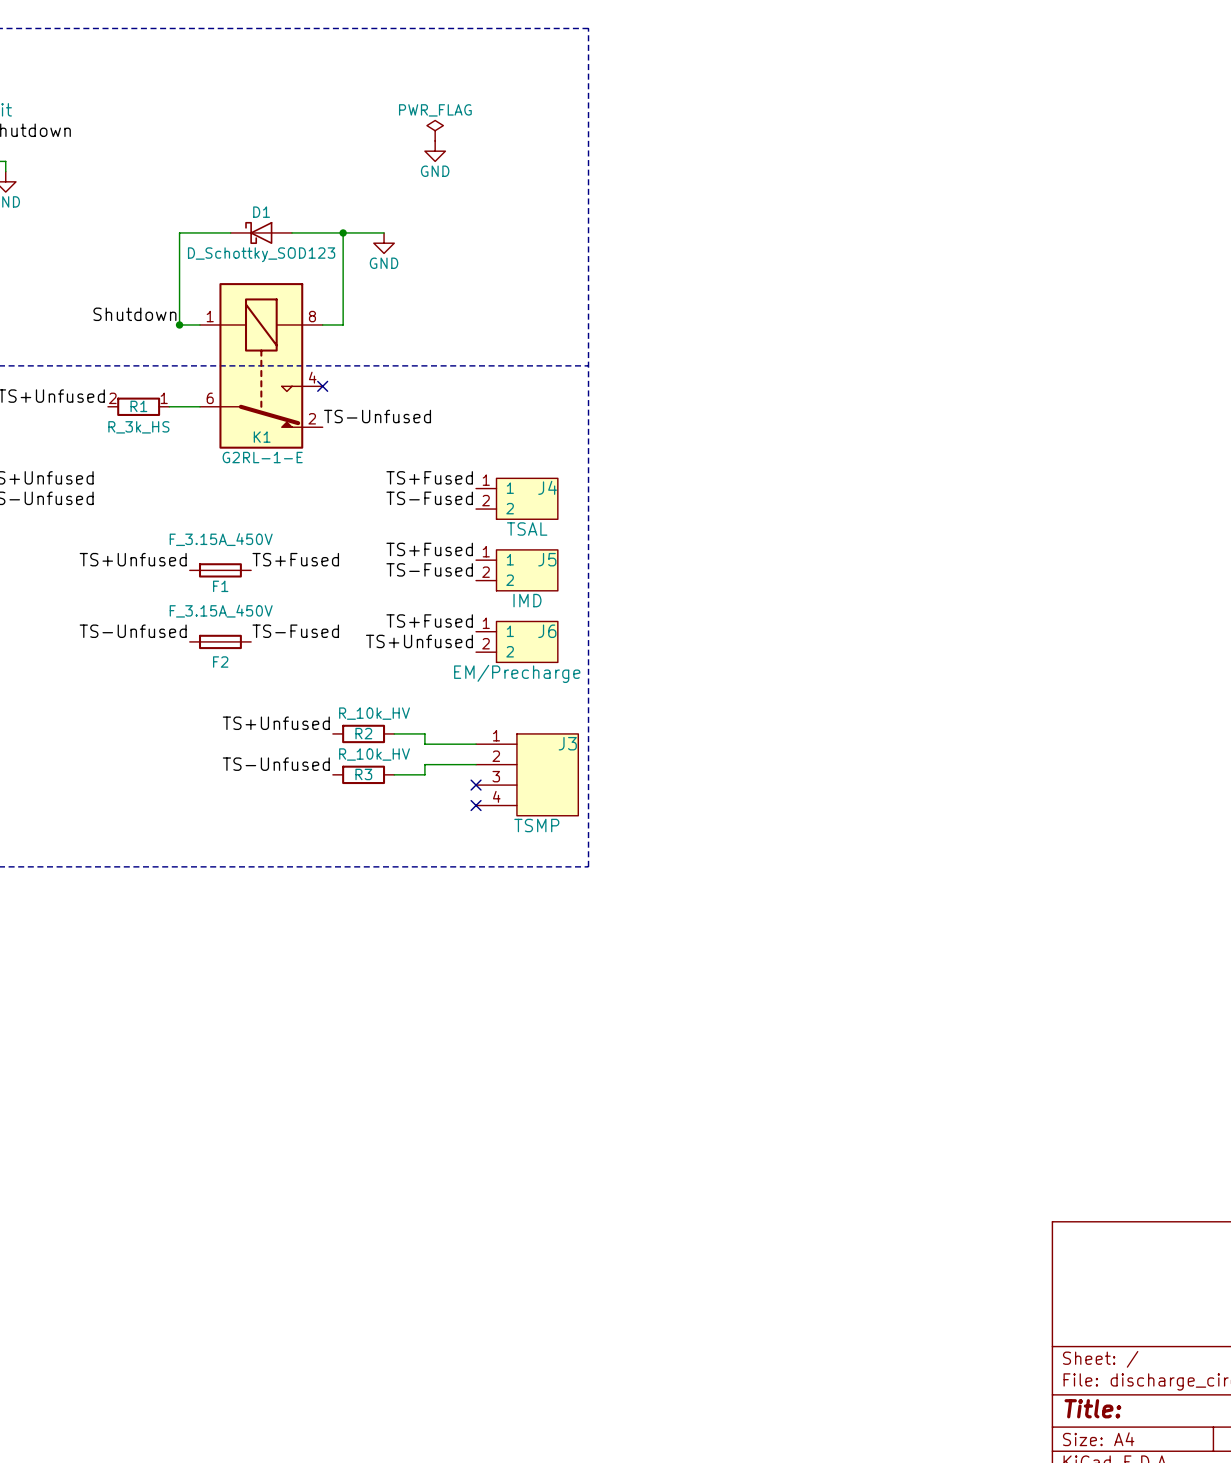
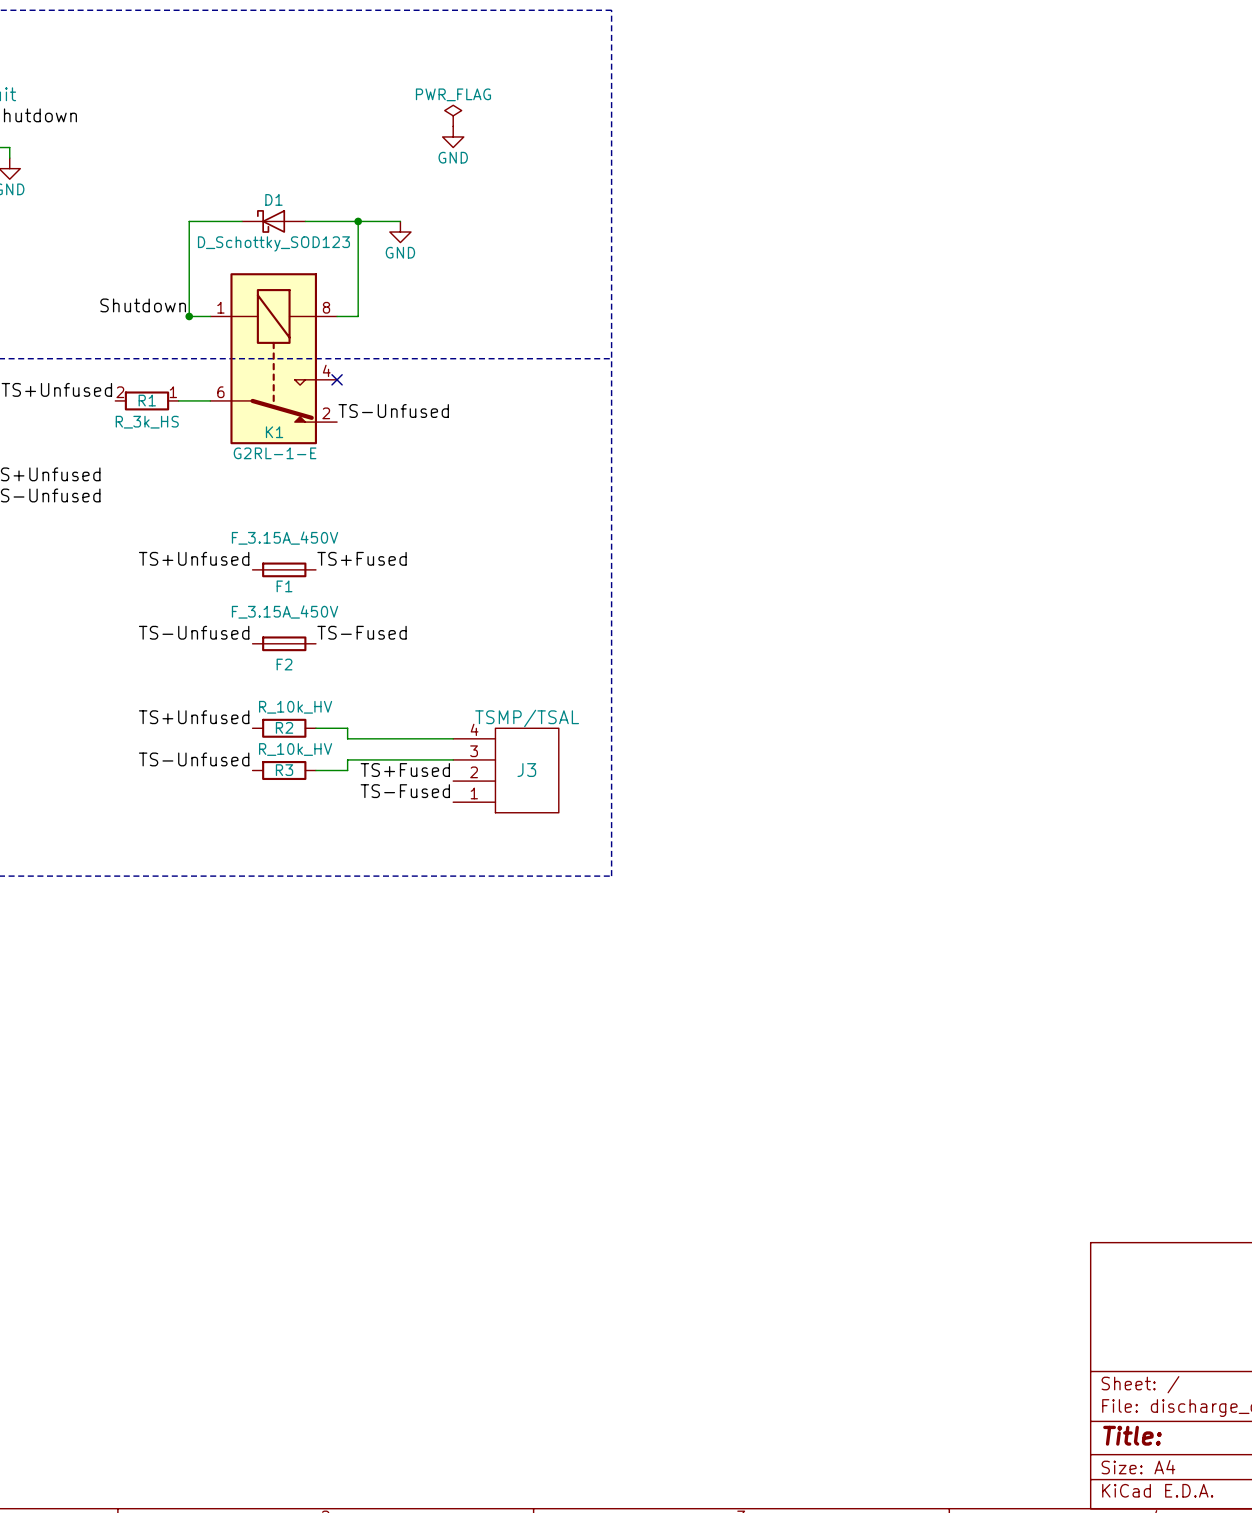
label: TS+Fused (429, 477) -> none
label: TS-Fused (429, 498) -> none
J4: TSAL (516, 498) -> none
label: TS+Fused (429, 549) -> none
label position: TS+Unfused (133, 559) -> TS+Unfused (194, 558)
label position: TS+Fused (295, 559) -> TS+Fused (362, 558)
label: TS-Fused (429, 569) -> none
F1 position: (220, 570) -> (284, 569)
J5: IMD (516, 570) -> none
label: TS+Fused (429, 621) -> none
label position: TS-Unfused (133, 631) -> TS-Unfused (194, 632)
label position: TS-Fused (295, 631) -> TS-Fused (362, 632)
F2 position: (220, 641) -> (284, 643)
label: TS+Unfused (419, 641) -> none
J6: EM/Precharge (516, 641) -> none
label position: TS+Unfused (276, 723) -> TS+Unfused (194, 717)
wire: none -> (315, 728) (347, 728) (347, 738) (410, 738)
R2 position: (363, 733) -> (284, 728)
wire: (424, 733) (424, 744) (476, 744) -> (442, 738) (453, 738)
J3 symbol: [476, 733, 579, 816] -> [453, 728, 559, 813]
J3 name position: J3 (567, 743) -> J3 (526, 770)
wire: none -> (453, 759) (347, 759) (347, 770) (315, 770)
label position: TS-Unfused (276, 764) -> TS-Unfused (194, 759)
label: none -> TS+Fused (405, 770)
wire: (476, 764) (424, 764) (424, 774) (394, 774) -> none
R3 position: (363, 774) -> (284, 770)
label: none -> TS-Fused (405, 791)
no-connect mark: (476, 785) -> none
no-connect mark: (476, 805) -> none
J3 value: TSMP (536, 825) -> TSMP/TSAL (527, 718)

